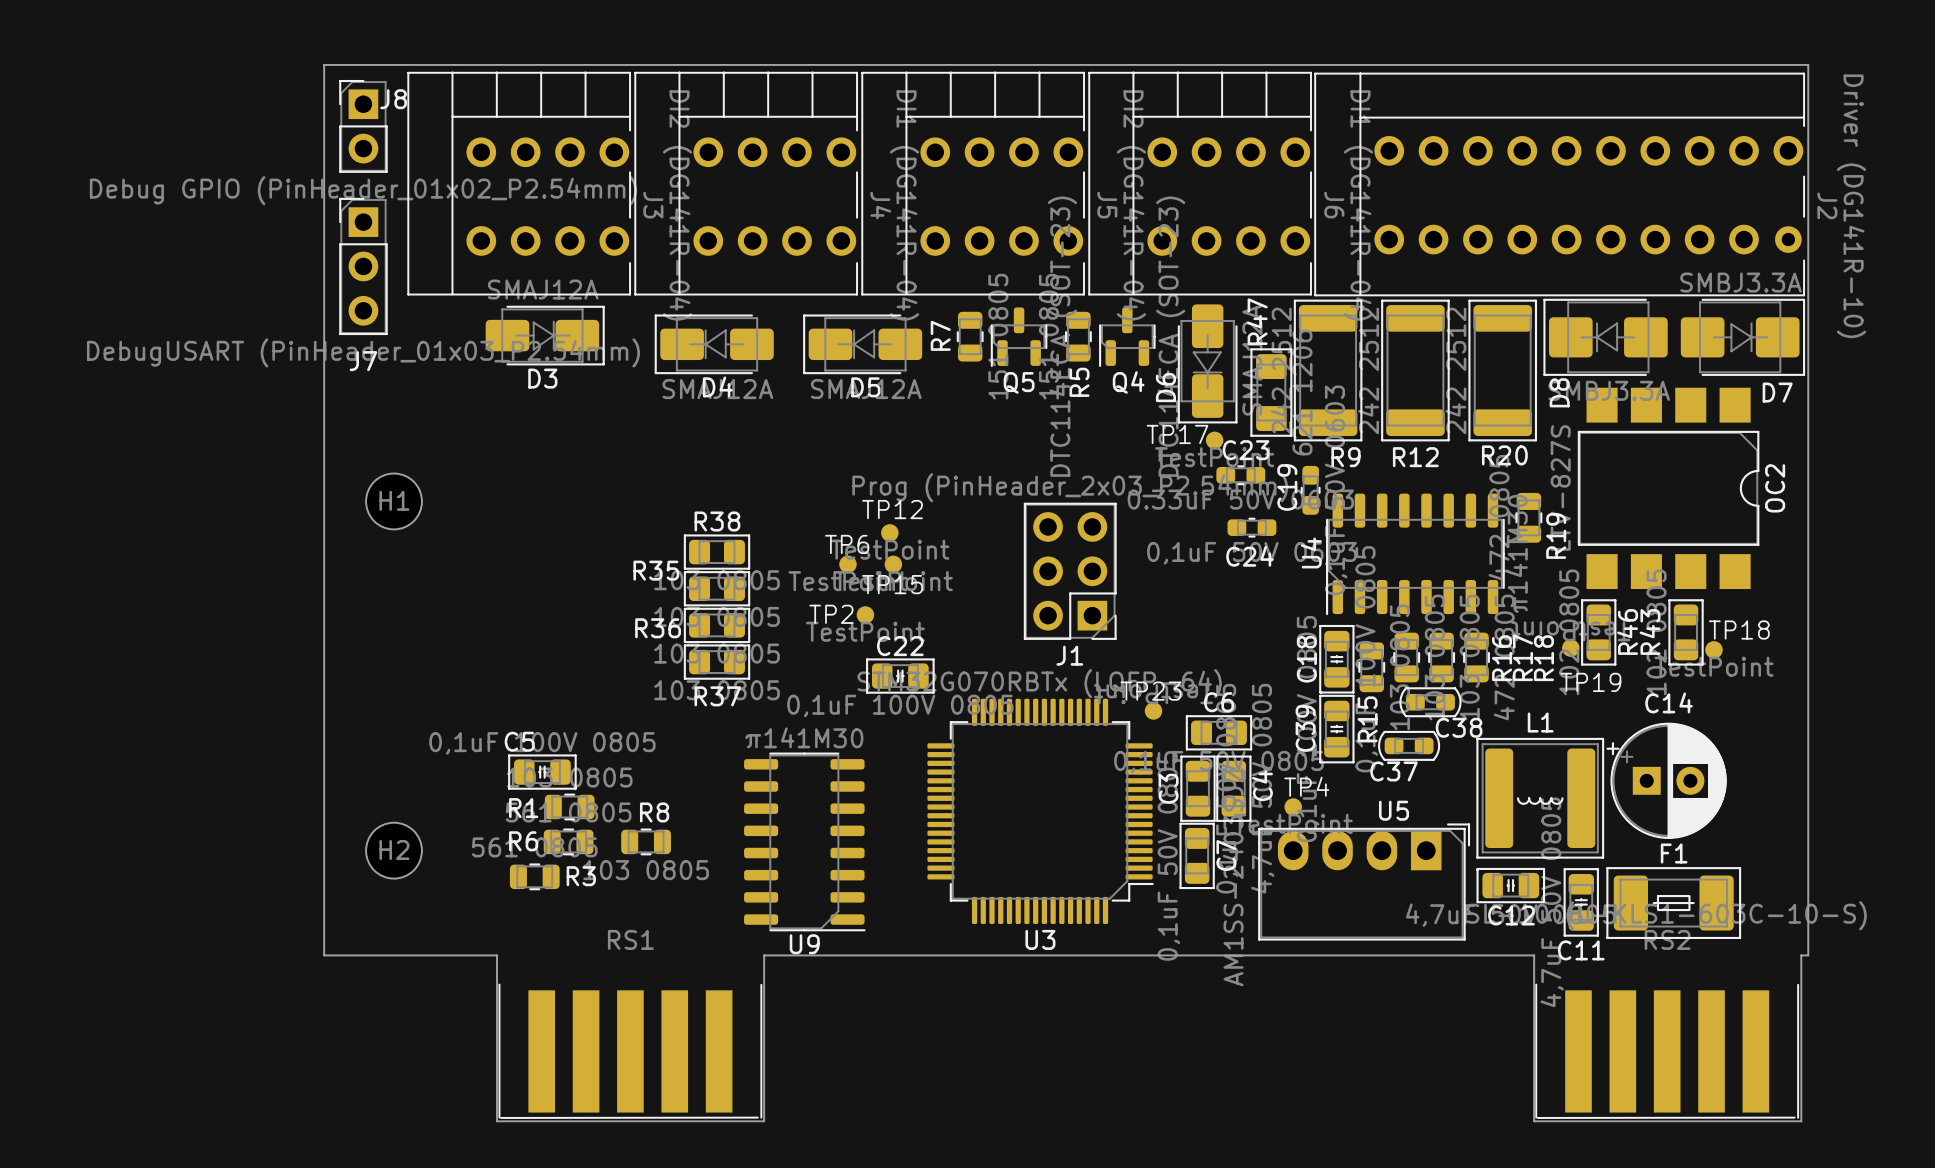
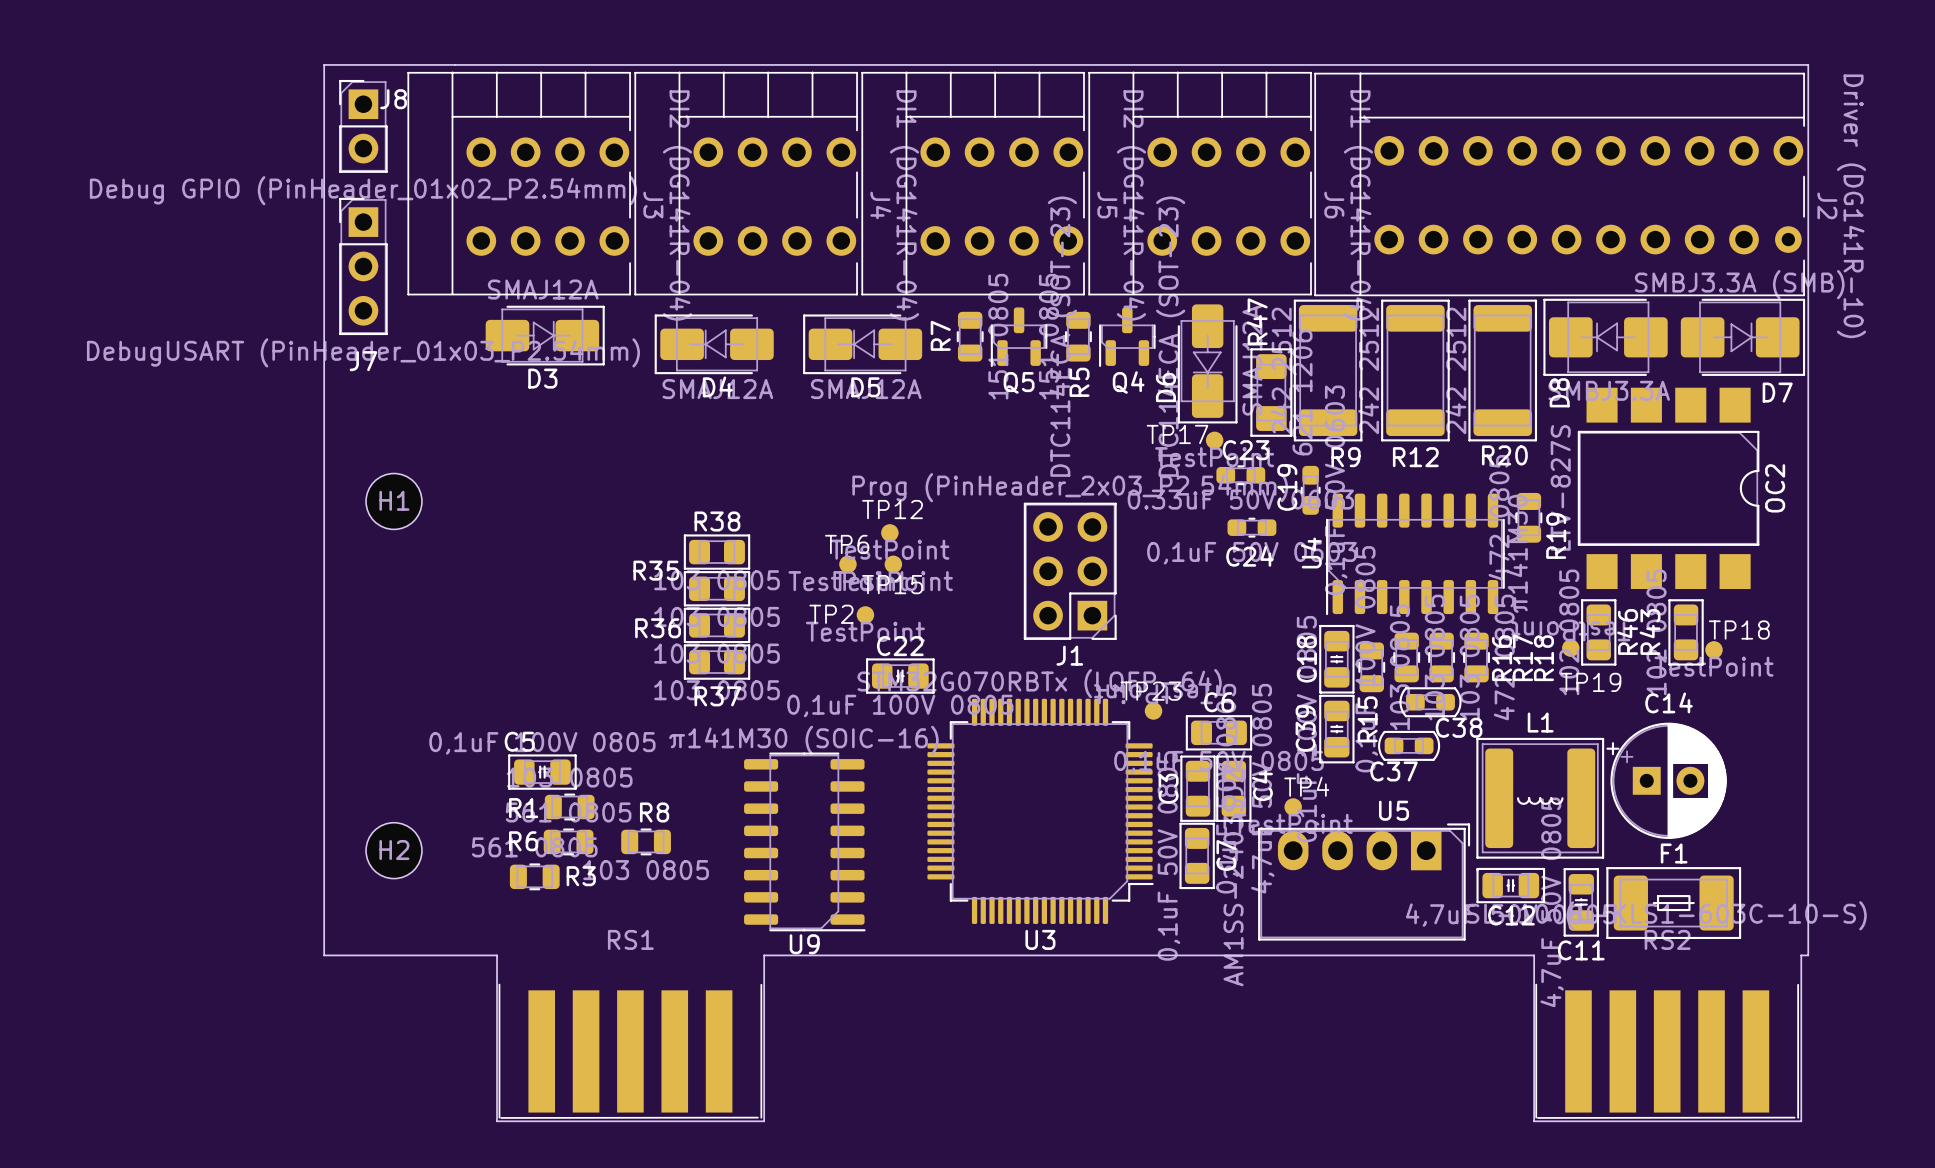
D7 value: SMBJ3.3A (1741, 282) -> SMBJ3.3A (SMB) (1739, 284)
U9 value: π141M30 (804, 737) -> π141M30 (SOIC-16) (803, 740)

